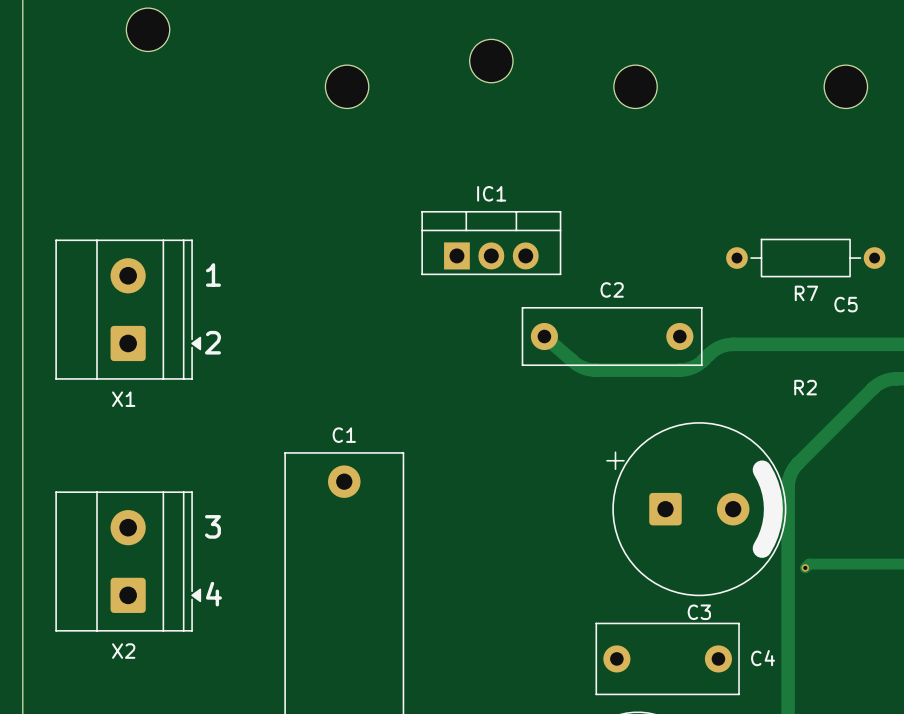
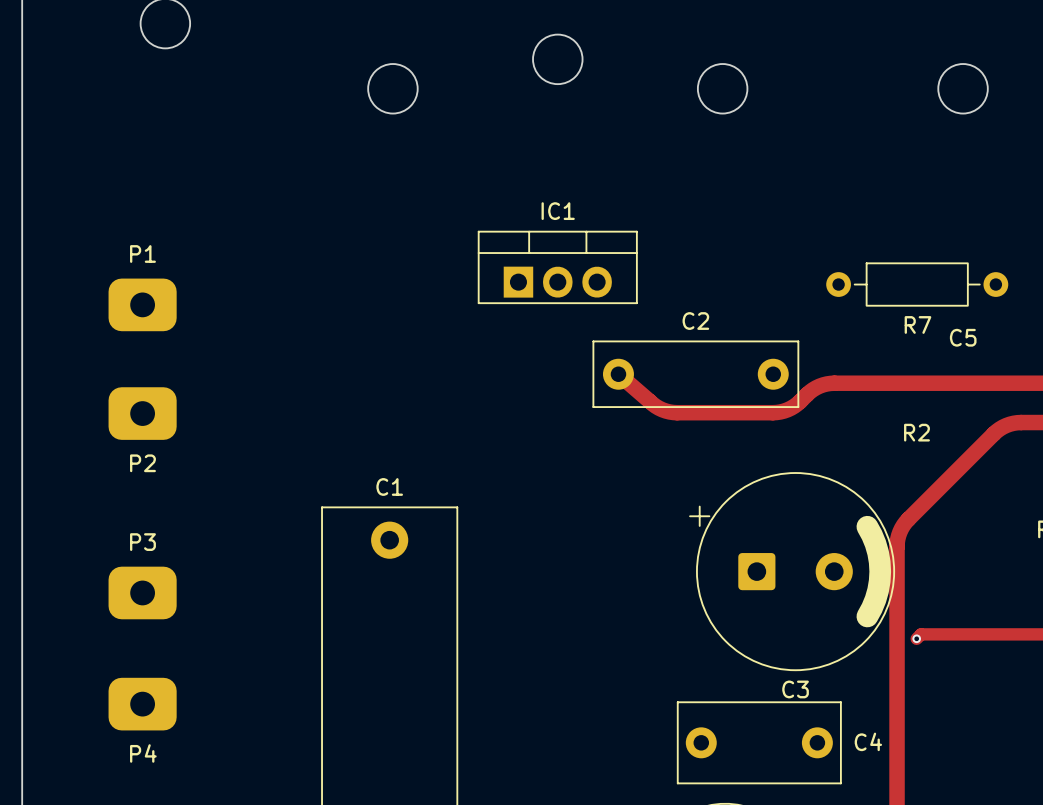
P1: none -> (142, 304)
text: 1 (213, 275) -> none
X1: (128, 309) -> none
text: 2 (212, 342) -> none
P2: none -> (142, 413)
text: 3 (212, 526) -> none
P3: none -> (142, 592)
X2: (128, 561) -> none
text: 4 (213, 594) -> none
P4: none -> (142, 704)

